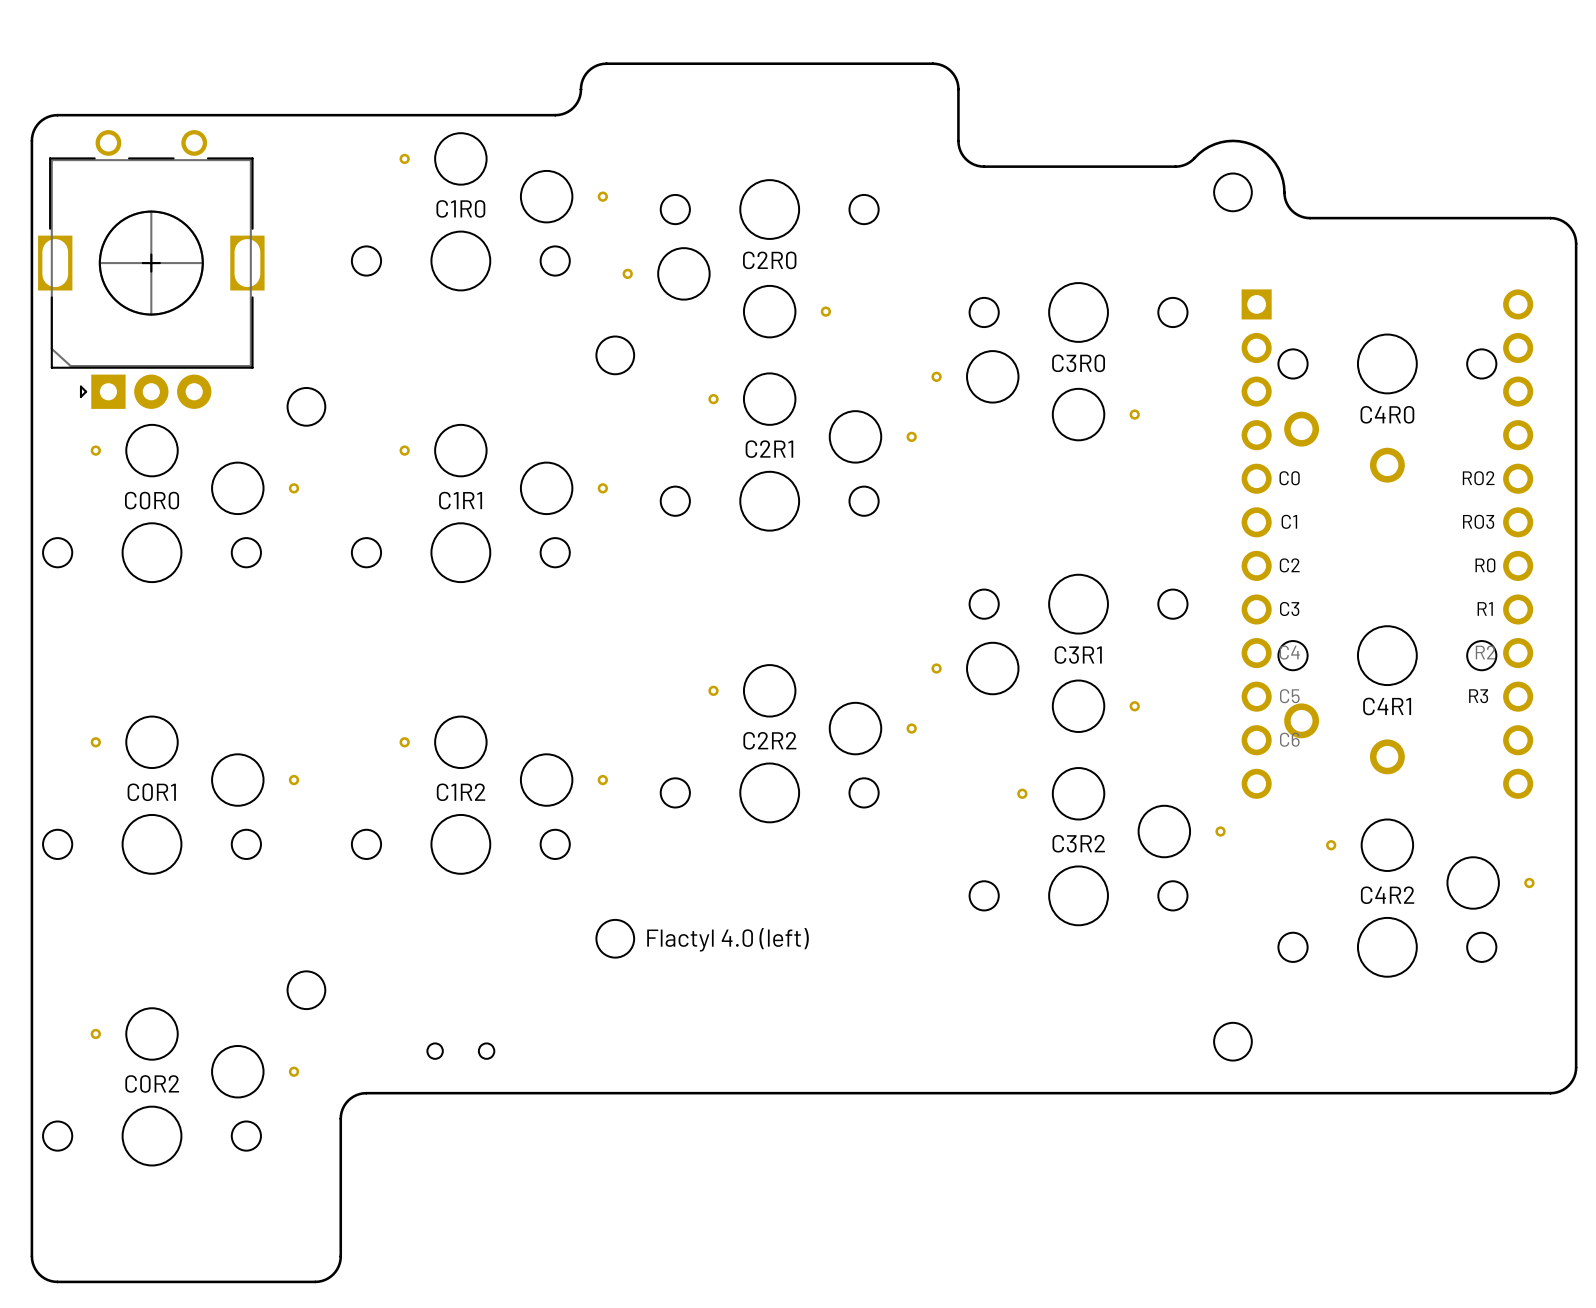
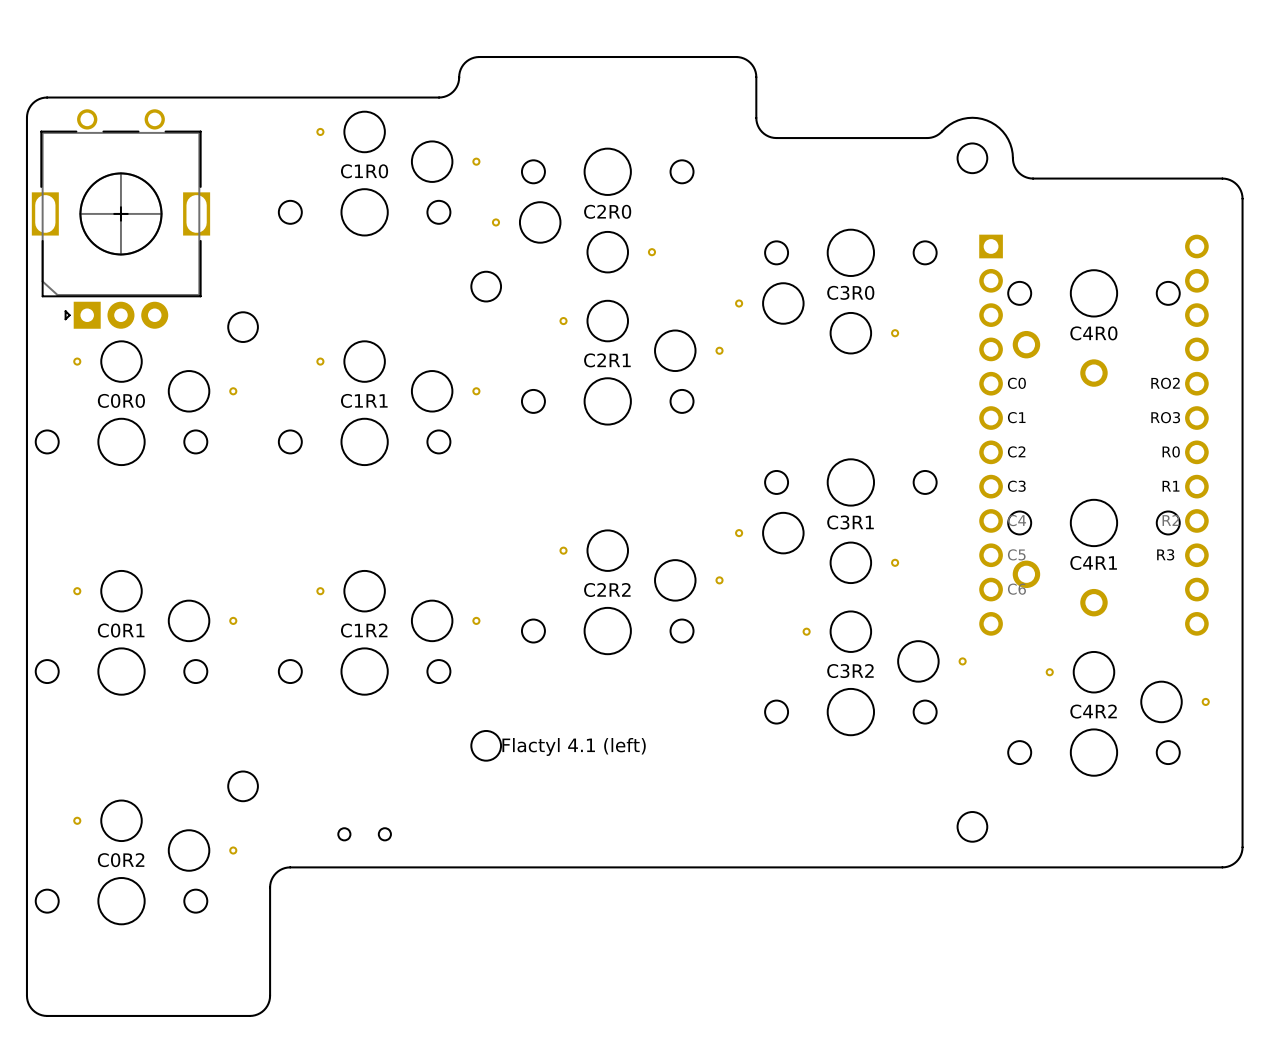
drawing shape: [647, 927, 809, 952] -> [502, 738, 646, 756]

